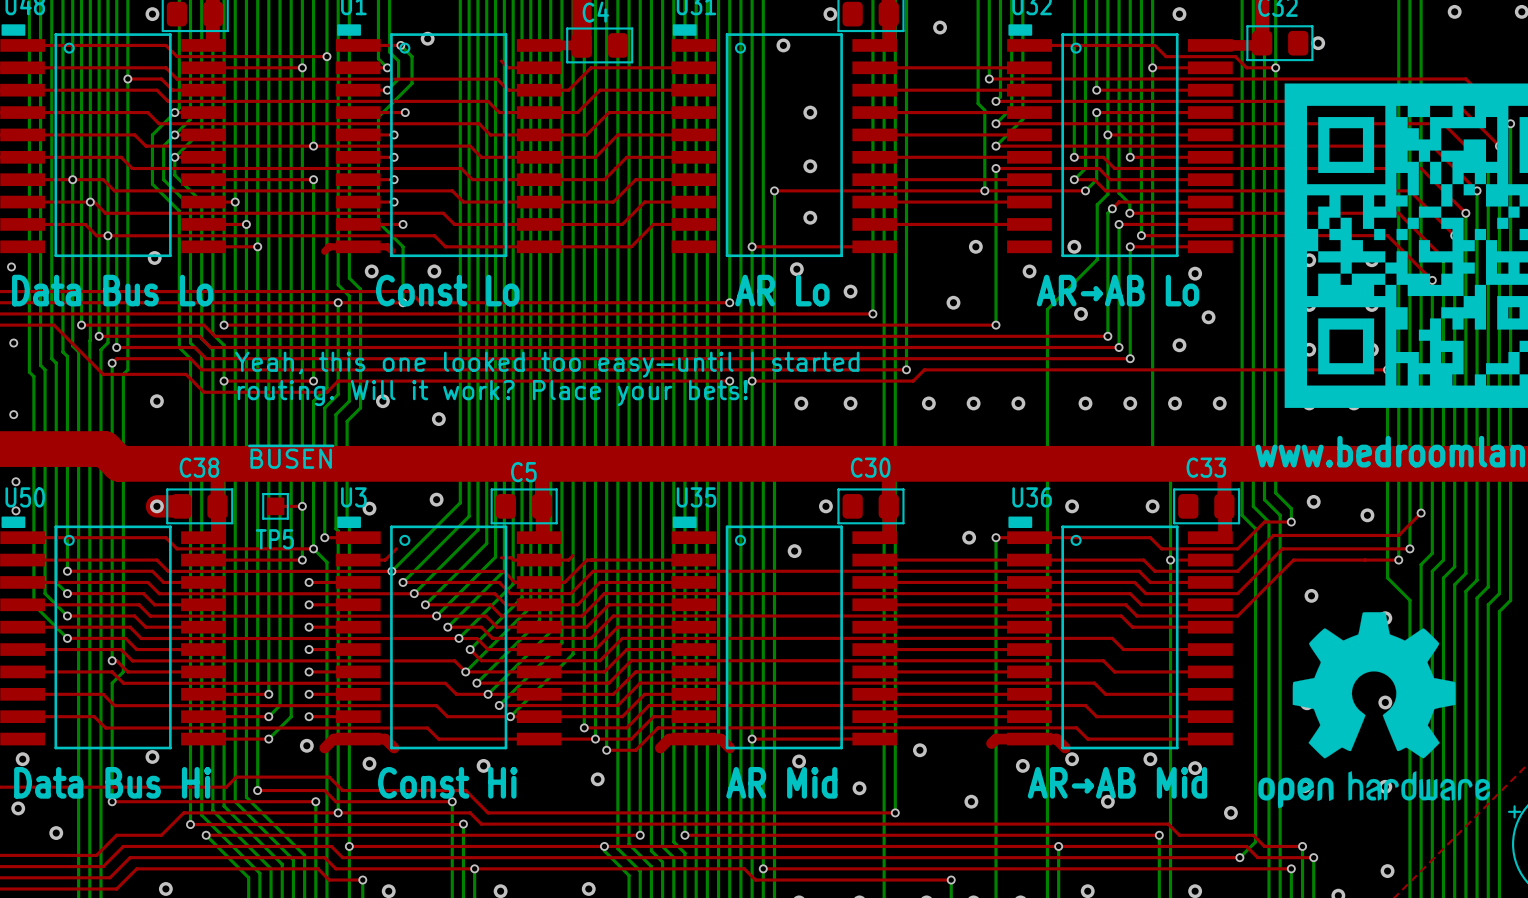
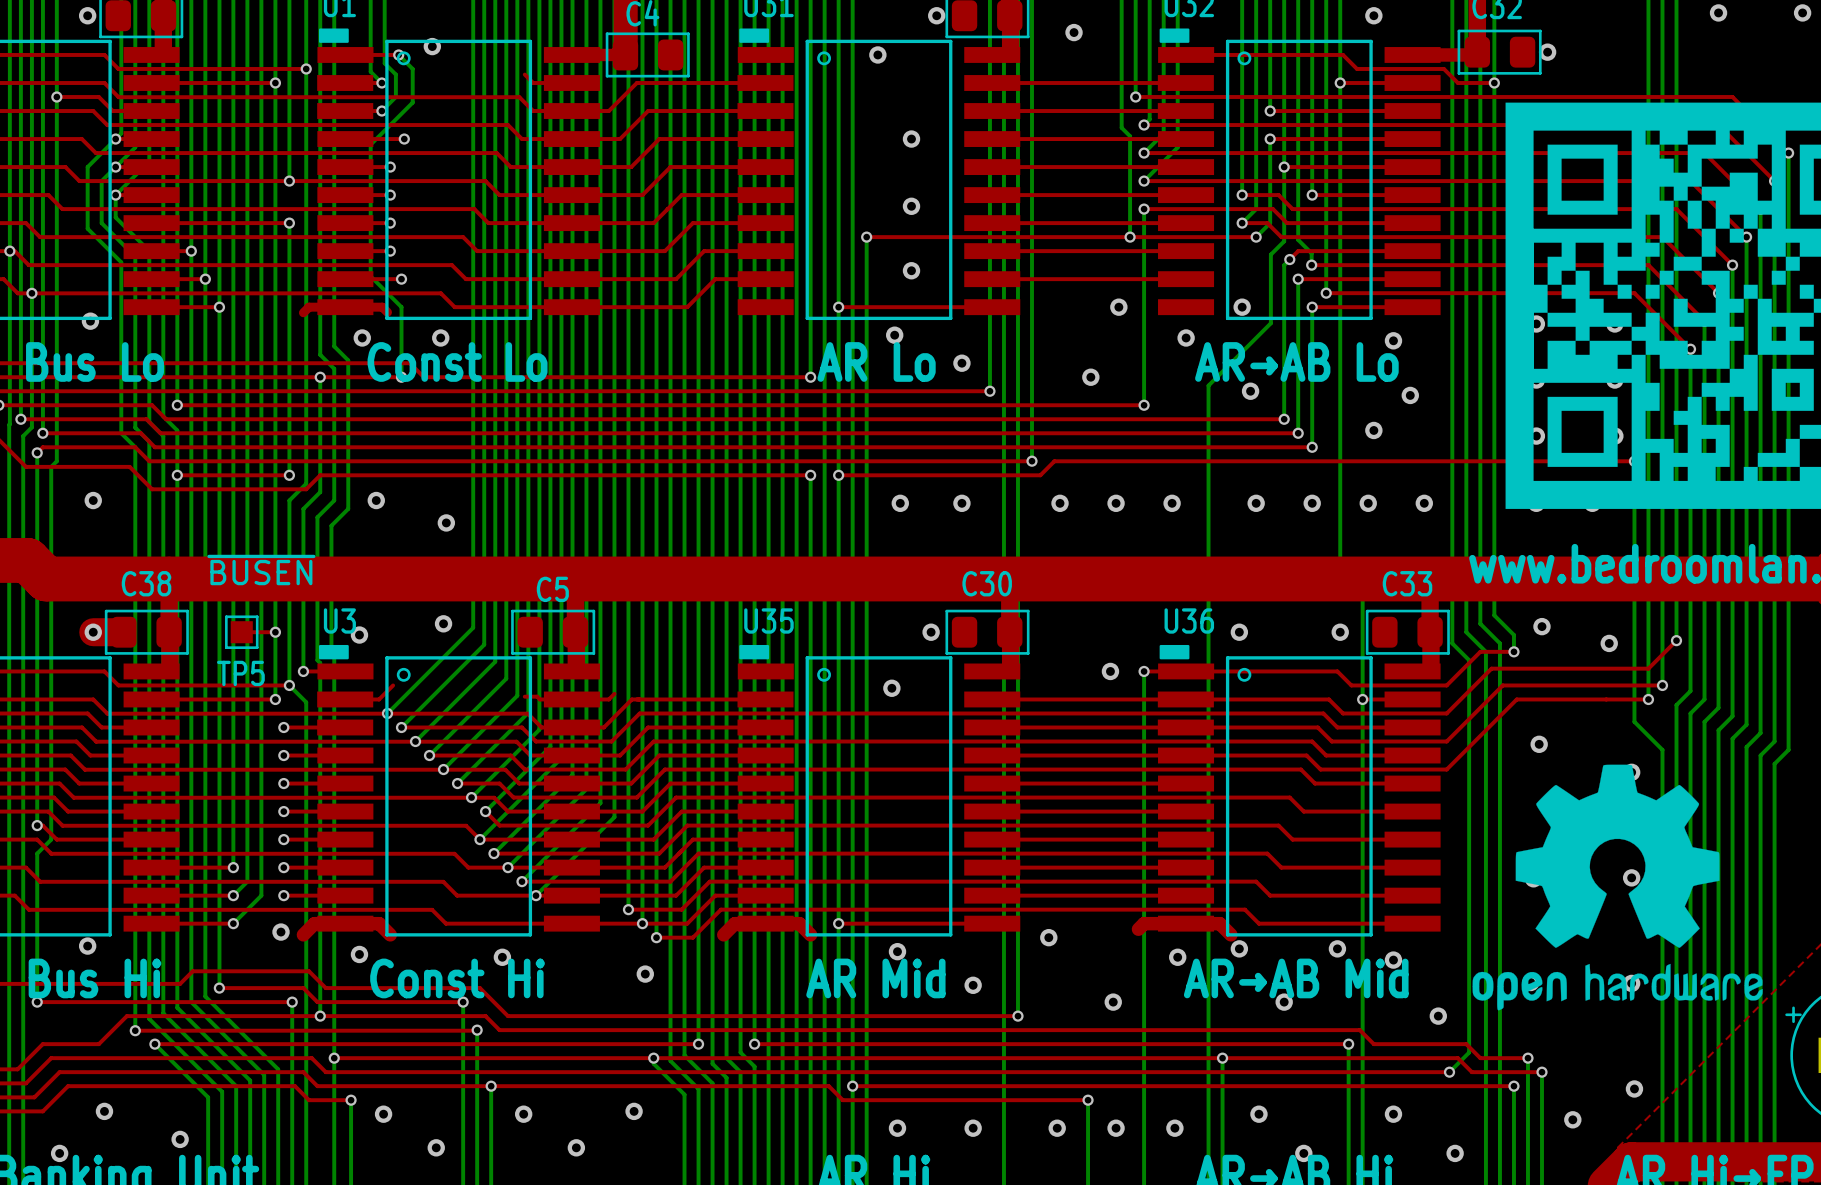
text: Yeah, this one looked too easy—until I started (547, 364) -> none
text: routing. Will it work? Place your bets! (492, 393) -> none

